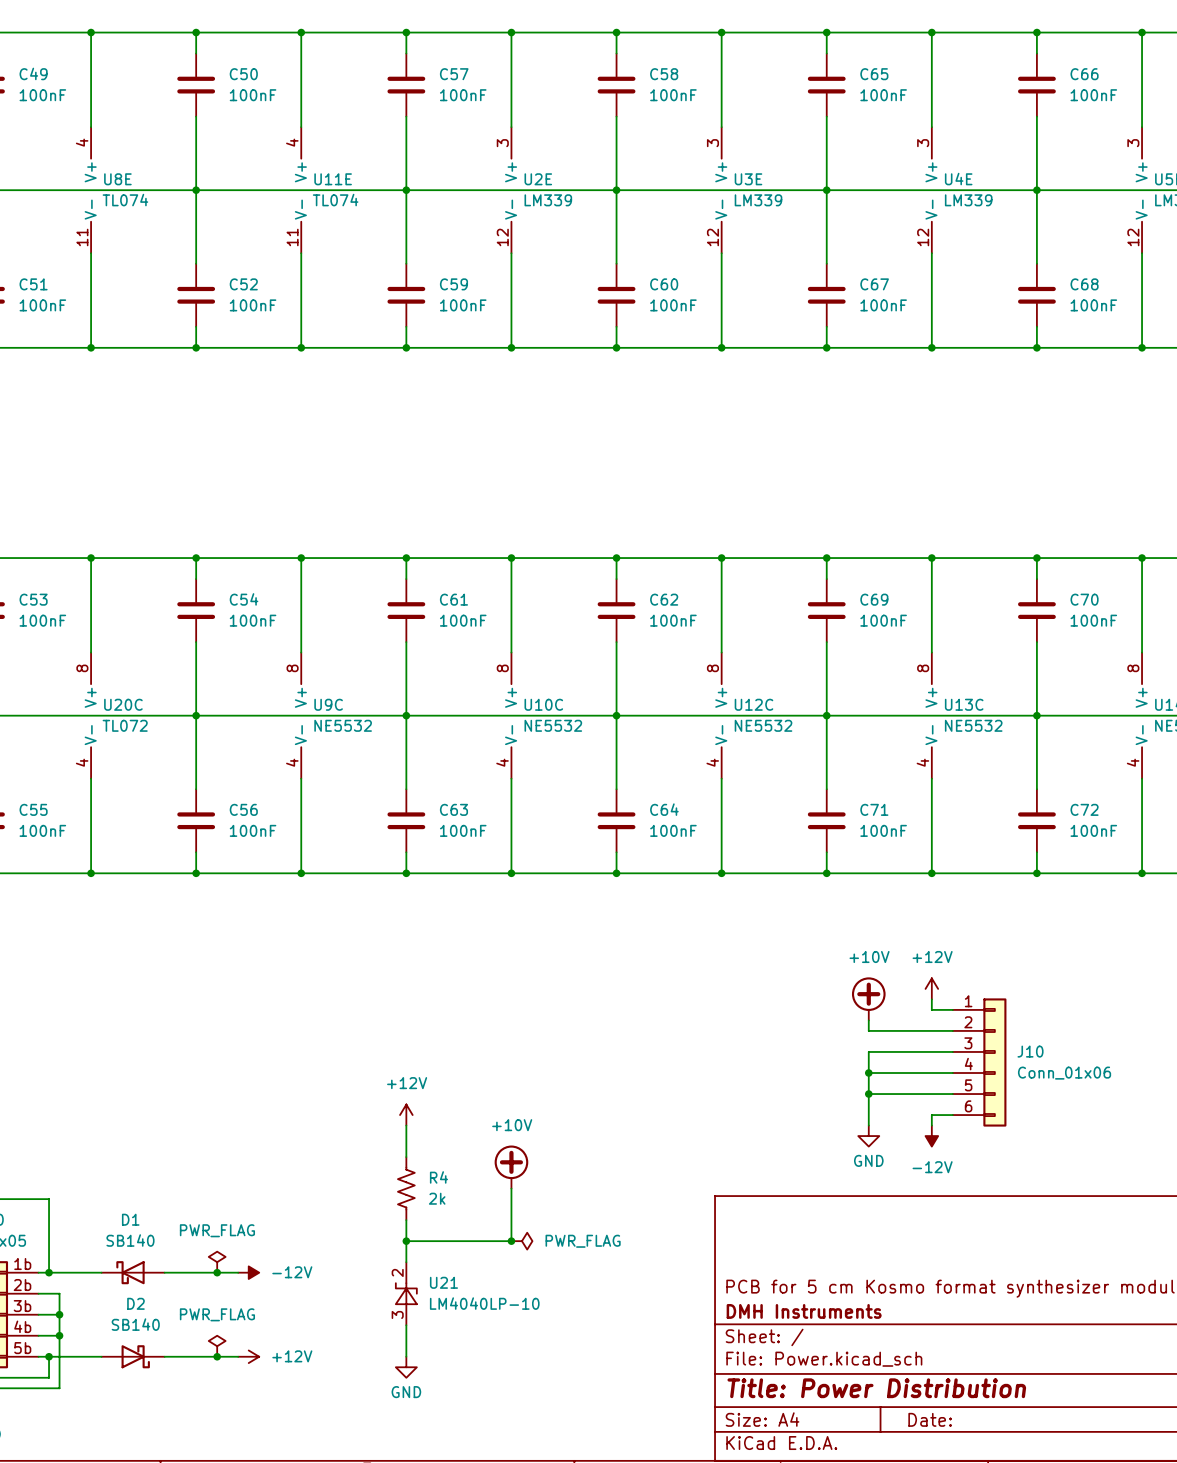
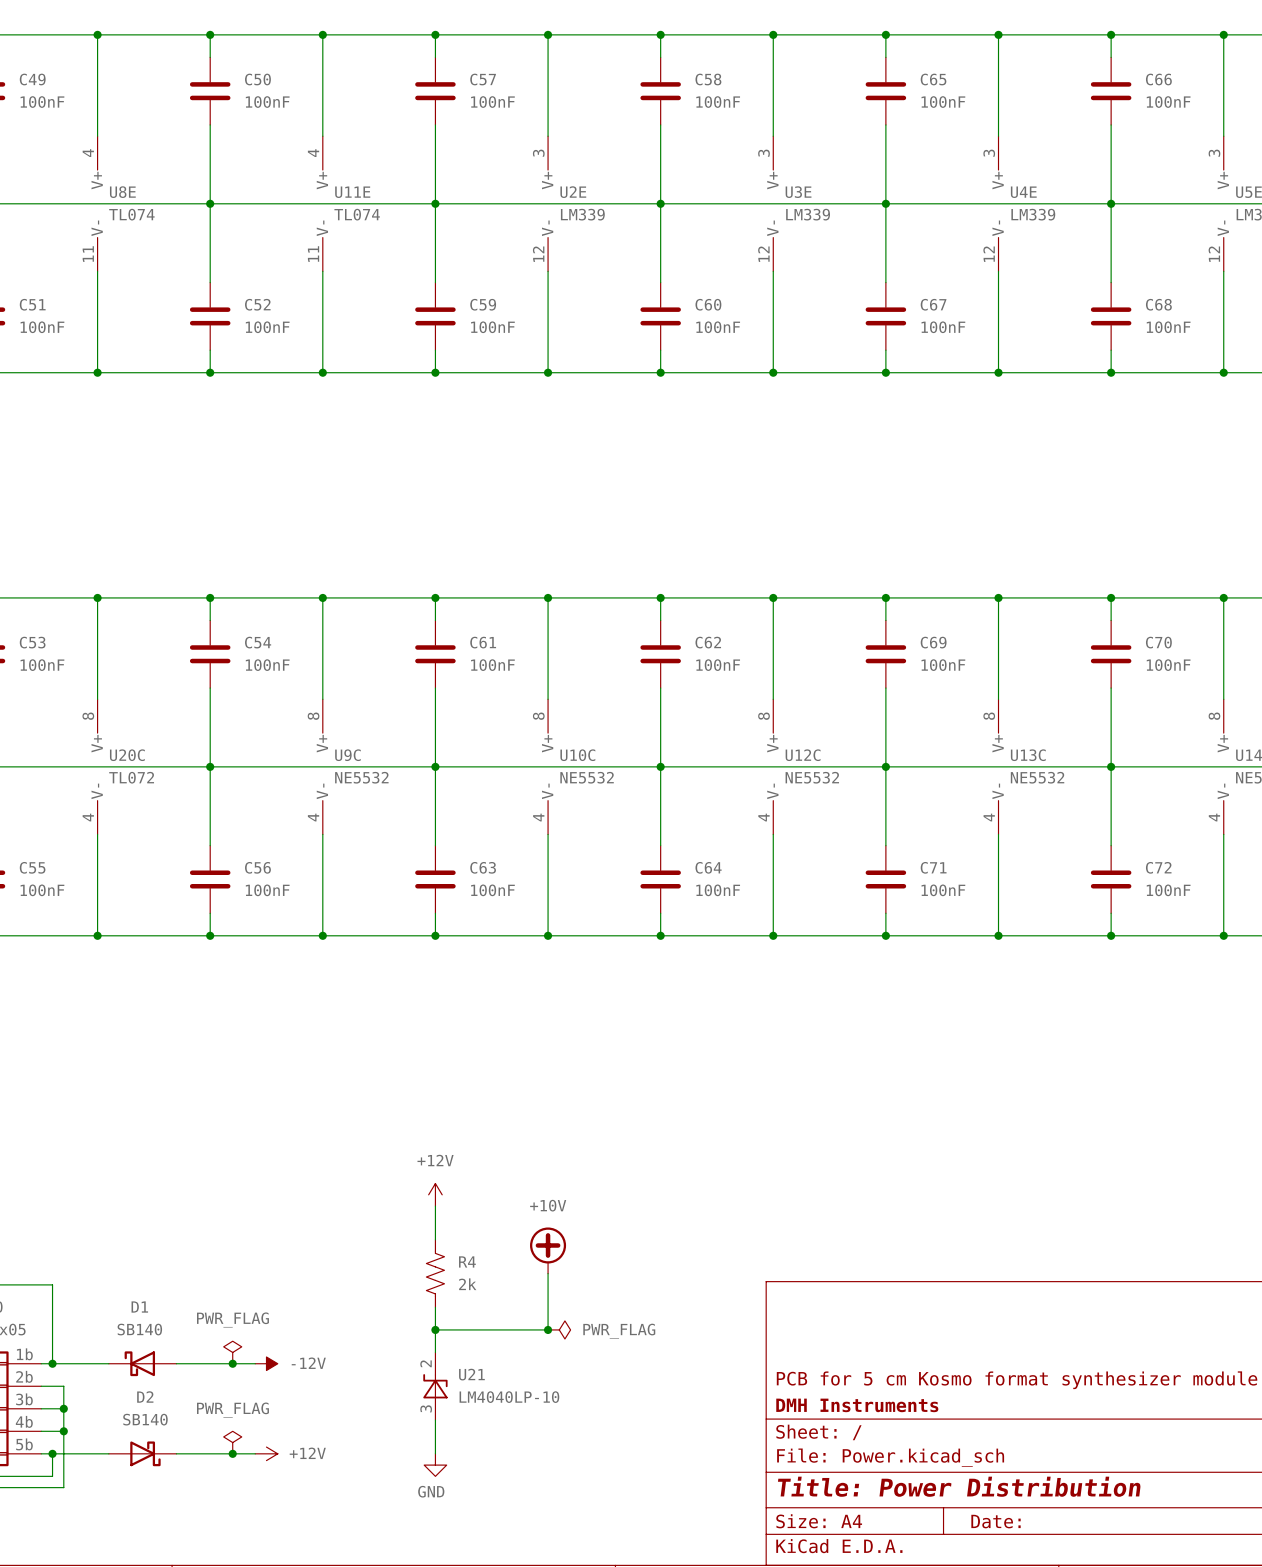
power symbol: +12V (931, 988) -> none
power symbol: +10V (868, 998) -> none
wire: (931, 999) (931, 1009) (952, 1009) -> none
wire: (868, 1020) (868, 1030) (952, 1030) -> none
wire: (952, 1051) (868, 1051) (868, 1125) -> none
J10: Conn_01x06 (979, 1062) -> none
wire: (868, 1073) (952, 1073) -> none
junction: (868, 1073) -> none
wire: (868, 1094) (952, 1094) -> none
junction: (868, 1094) -> none
wire: (952, 1115) (931, 1115) (931, 1125) -> none
power symbol: GND (868, 1136) -> none
power symbol: -12V (931, 1136) -> none

